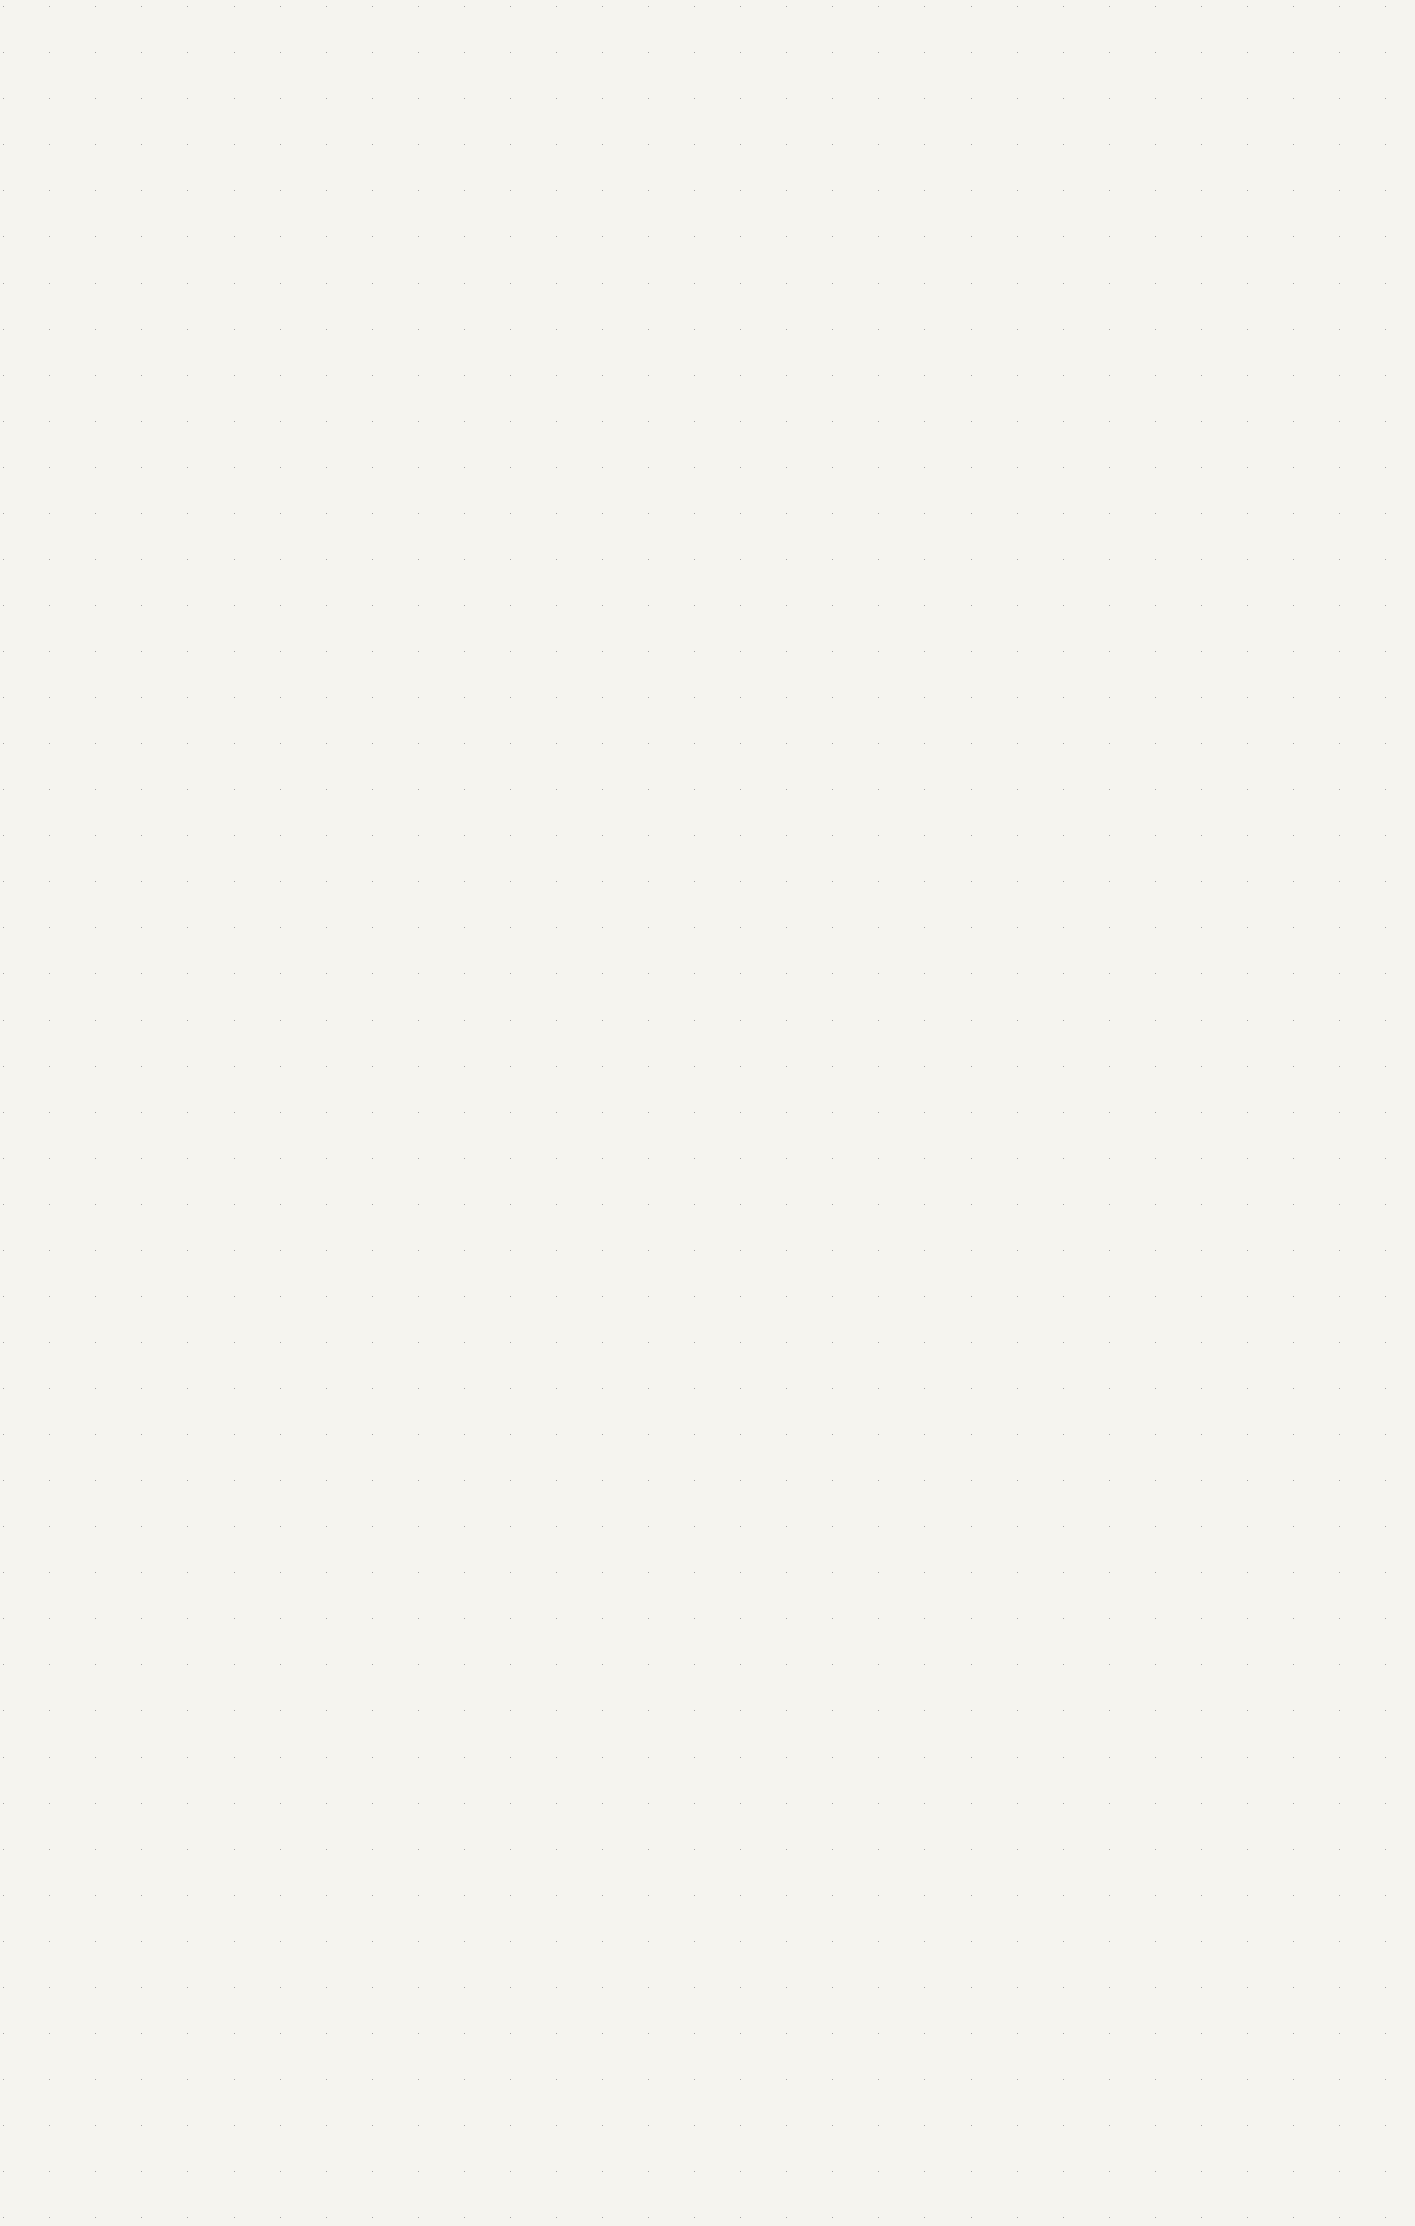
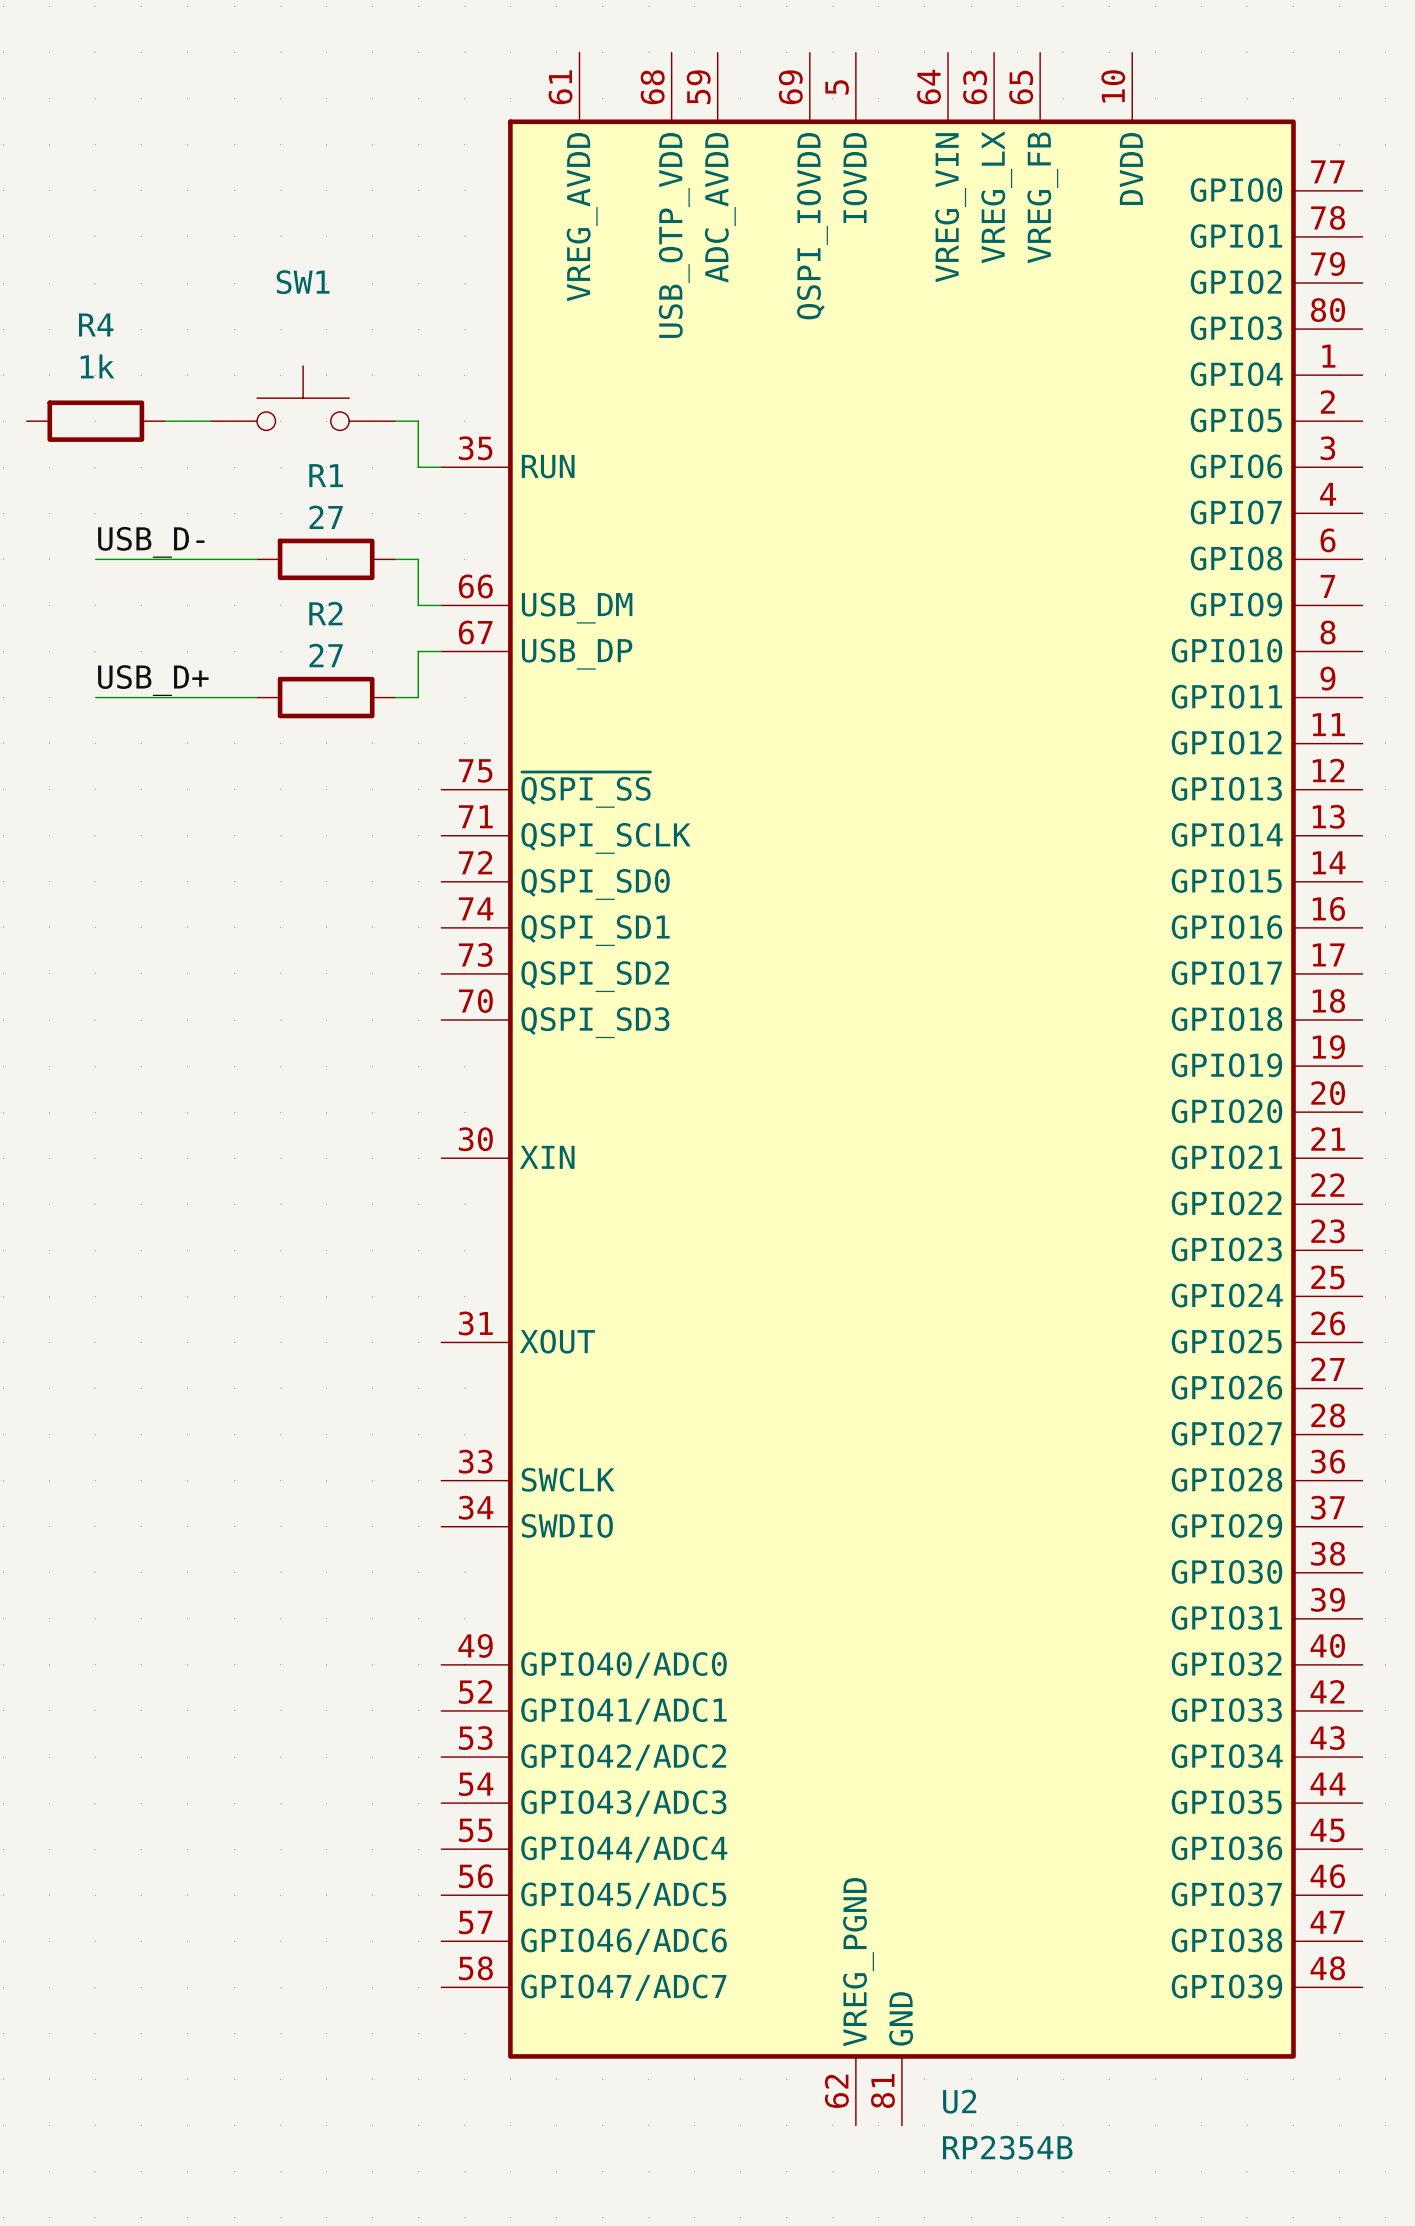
SW1: none -> (303, 398)
R4: none -> 1k (95, 421)
wire: none -> (164, 421) (210, 421)
wire: none -> (395, 421) (418, 421) (418, 467) (441, 467)
label: none -> USB_D- (151, 542)
wire: none -> (95, 559) (257, 559)
R1: none -> 27 (326, 559)
wire: none -> (395, 559) (418, 559) (418, 605) (441, 605)
wire: none -> (441, 651) (418, 651) (418, 697) (395, 697)
label: none -> USB_D+ (153, 680)
wire: none -> (95, 697) (257, 697)
R2: none -> 27 (326, 697)
U2: none -> RP2354B (901, 1089)

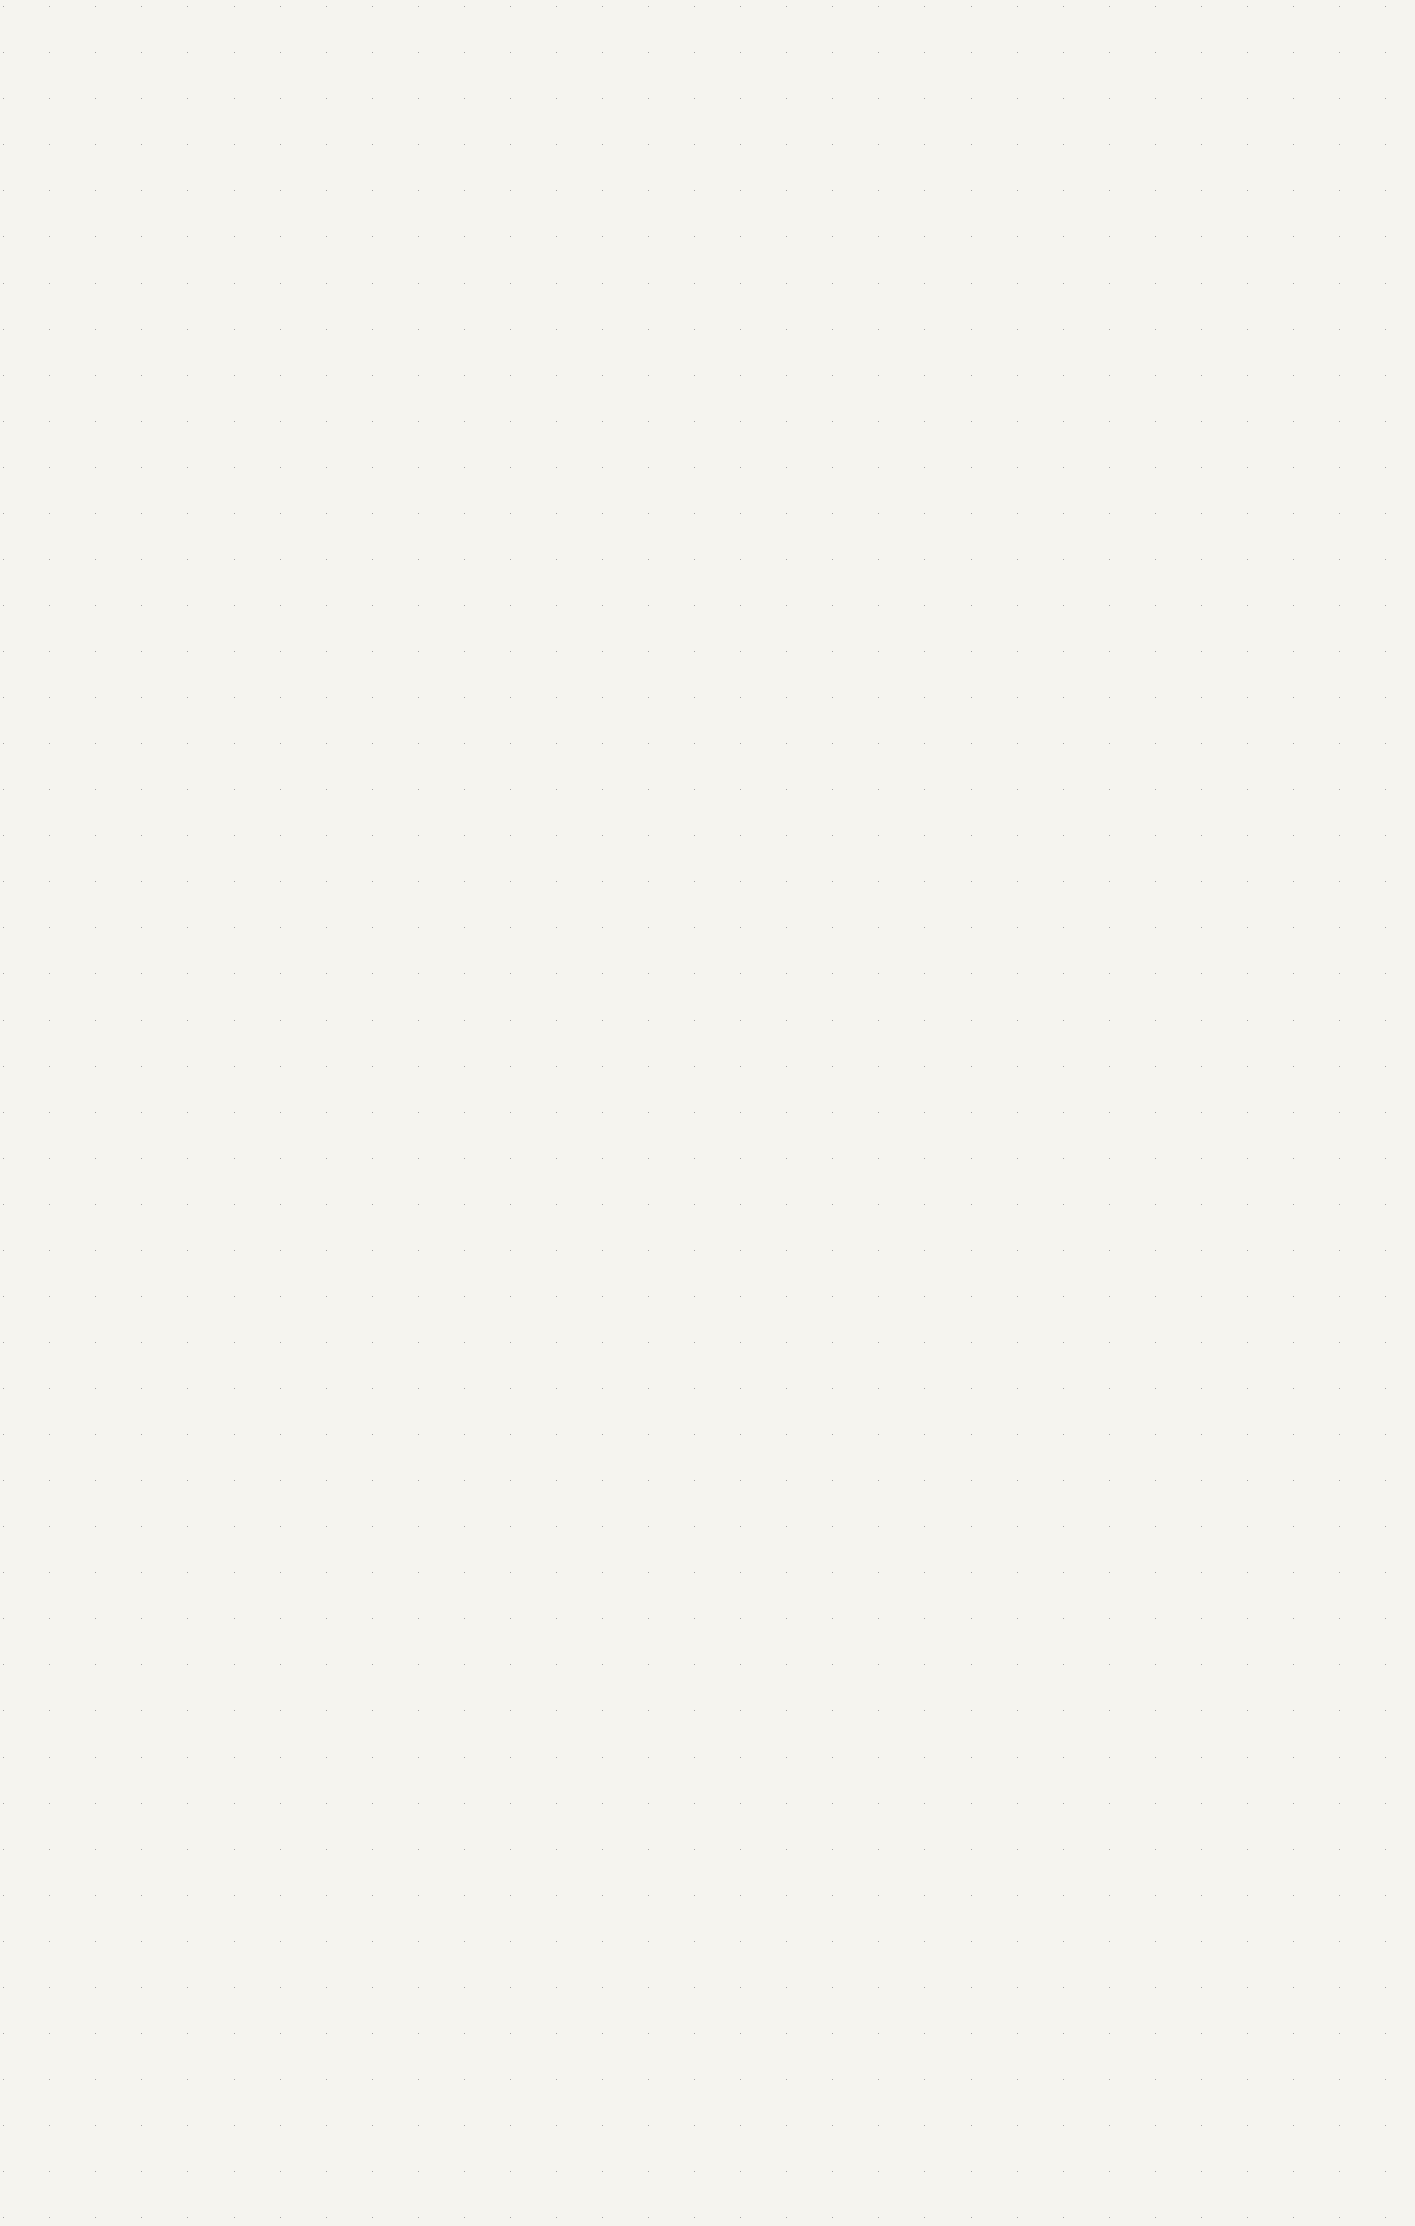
SW1: (303, 398) -> none
R4: 1k (95, 421) -> none
wire: (164, 421) (210, 421) -> none
wire: (395, 421) (418, 421) (418, 467) (441, 467) -> none
label: USB_D- (151, 542) -> none
wire: (95, 559) (257, 559) -> none
R1: 27 (326, 559) -> none
wire: (395, 559) (418, 559) (418, 605) (441, 605) -> none
wire: (441, 651) (418, 651) (418, 697) (395, 697) -> none
label: USB_D+ (153, 680) -> none
wire: (95, 697) (257, 697) -> none
R2: 27 (326, 697) -> none
U2: RP2354B (901, 1089) -> none

